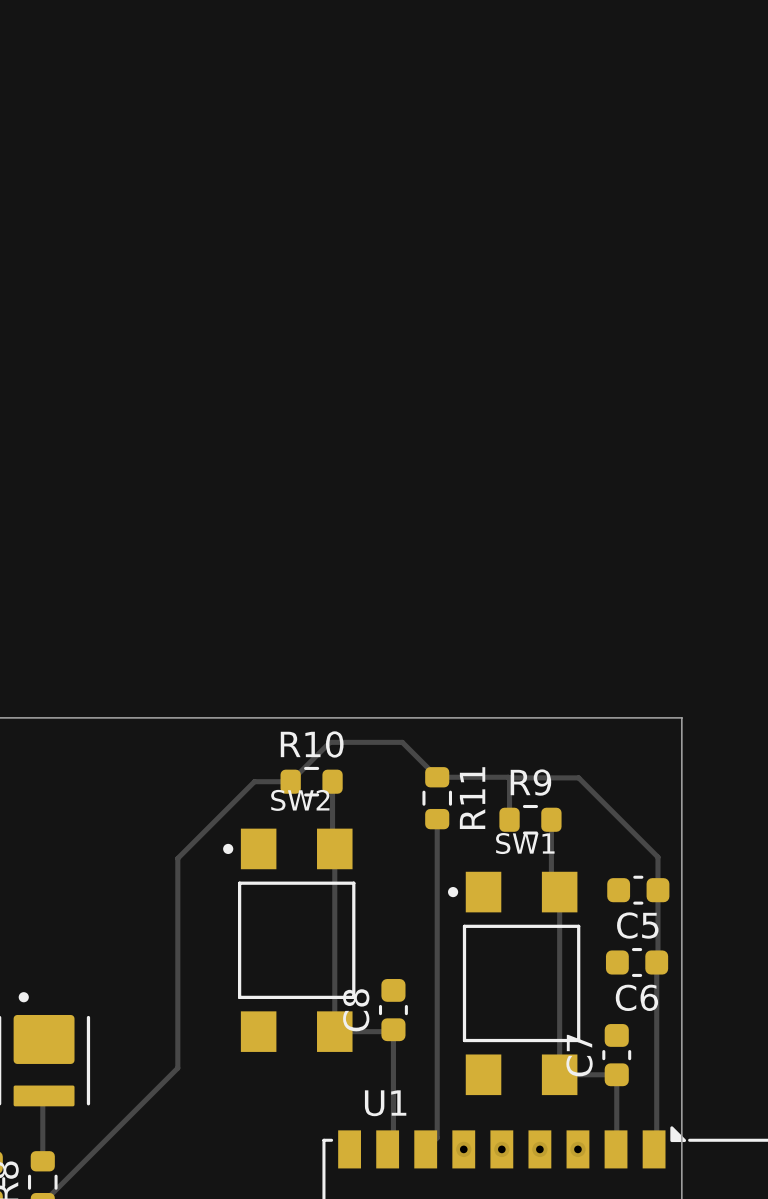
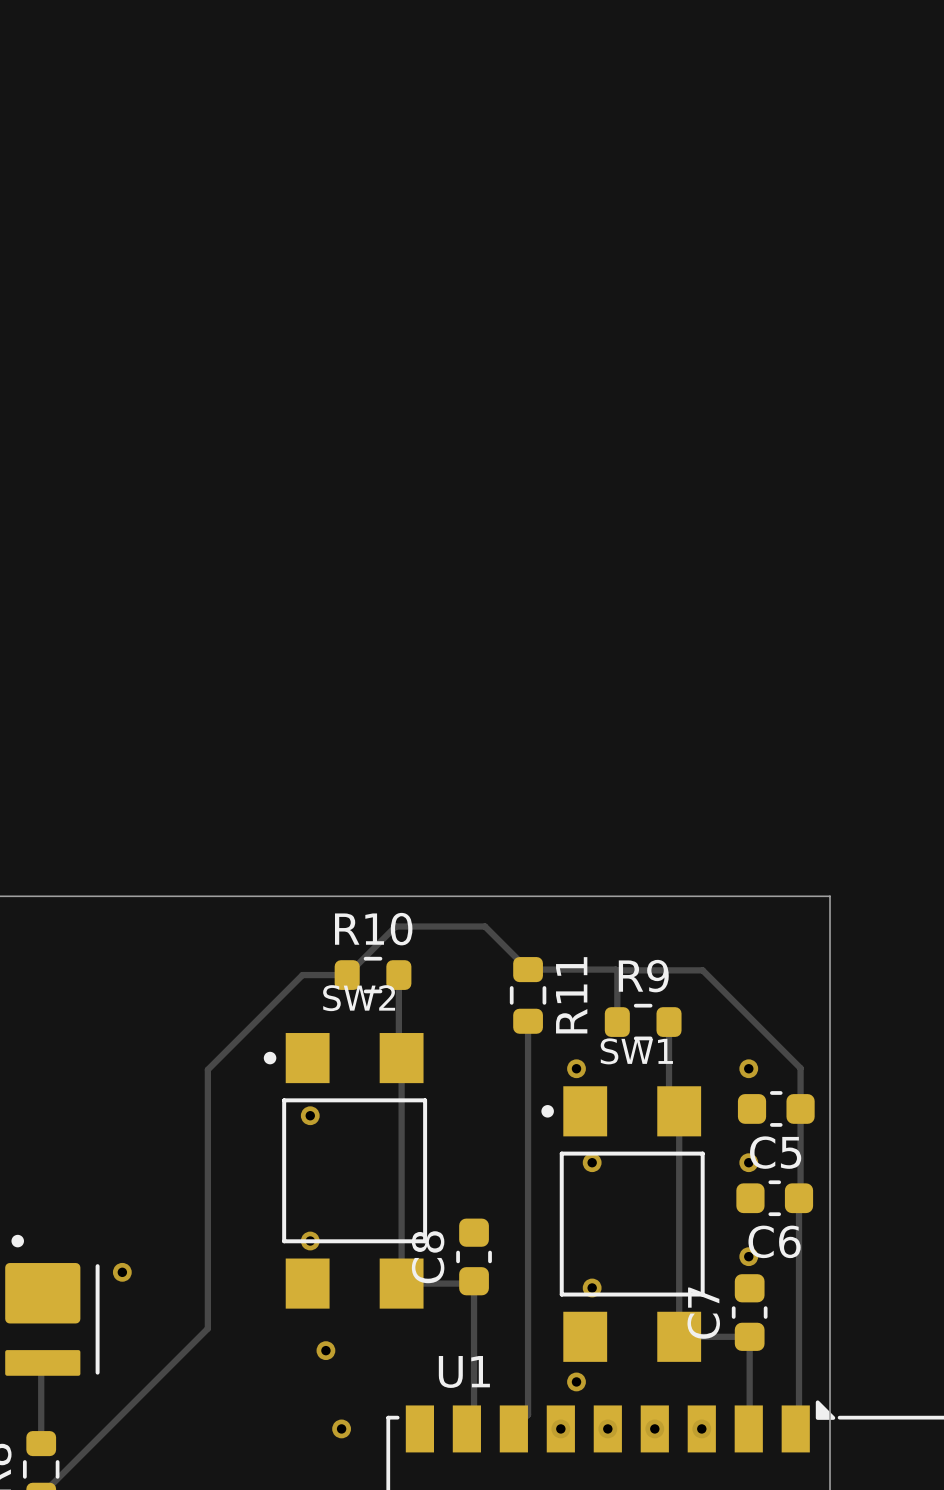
via: none -> (576, 1068)
via: none -> (748, 1068)
via: none -> (310, 1115)
via: none -> (592, 1162)
via: none -> (748, 1162)
via: none -> (310, 1241)
via: none -> (748, 1256)
via: none -> (122, 1272)
via: none -> (592, 1287)
via: none -> (325, 1350)
via: none -> (576, 1381)
via: none -> (341, 1428)

